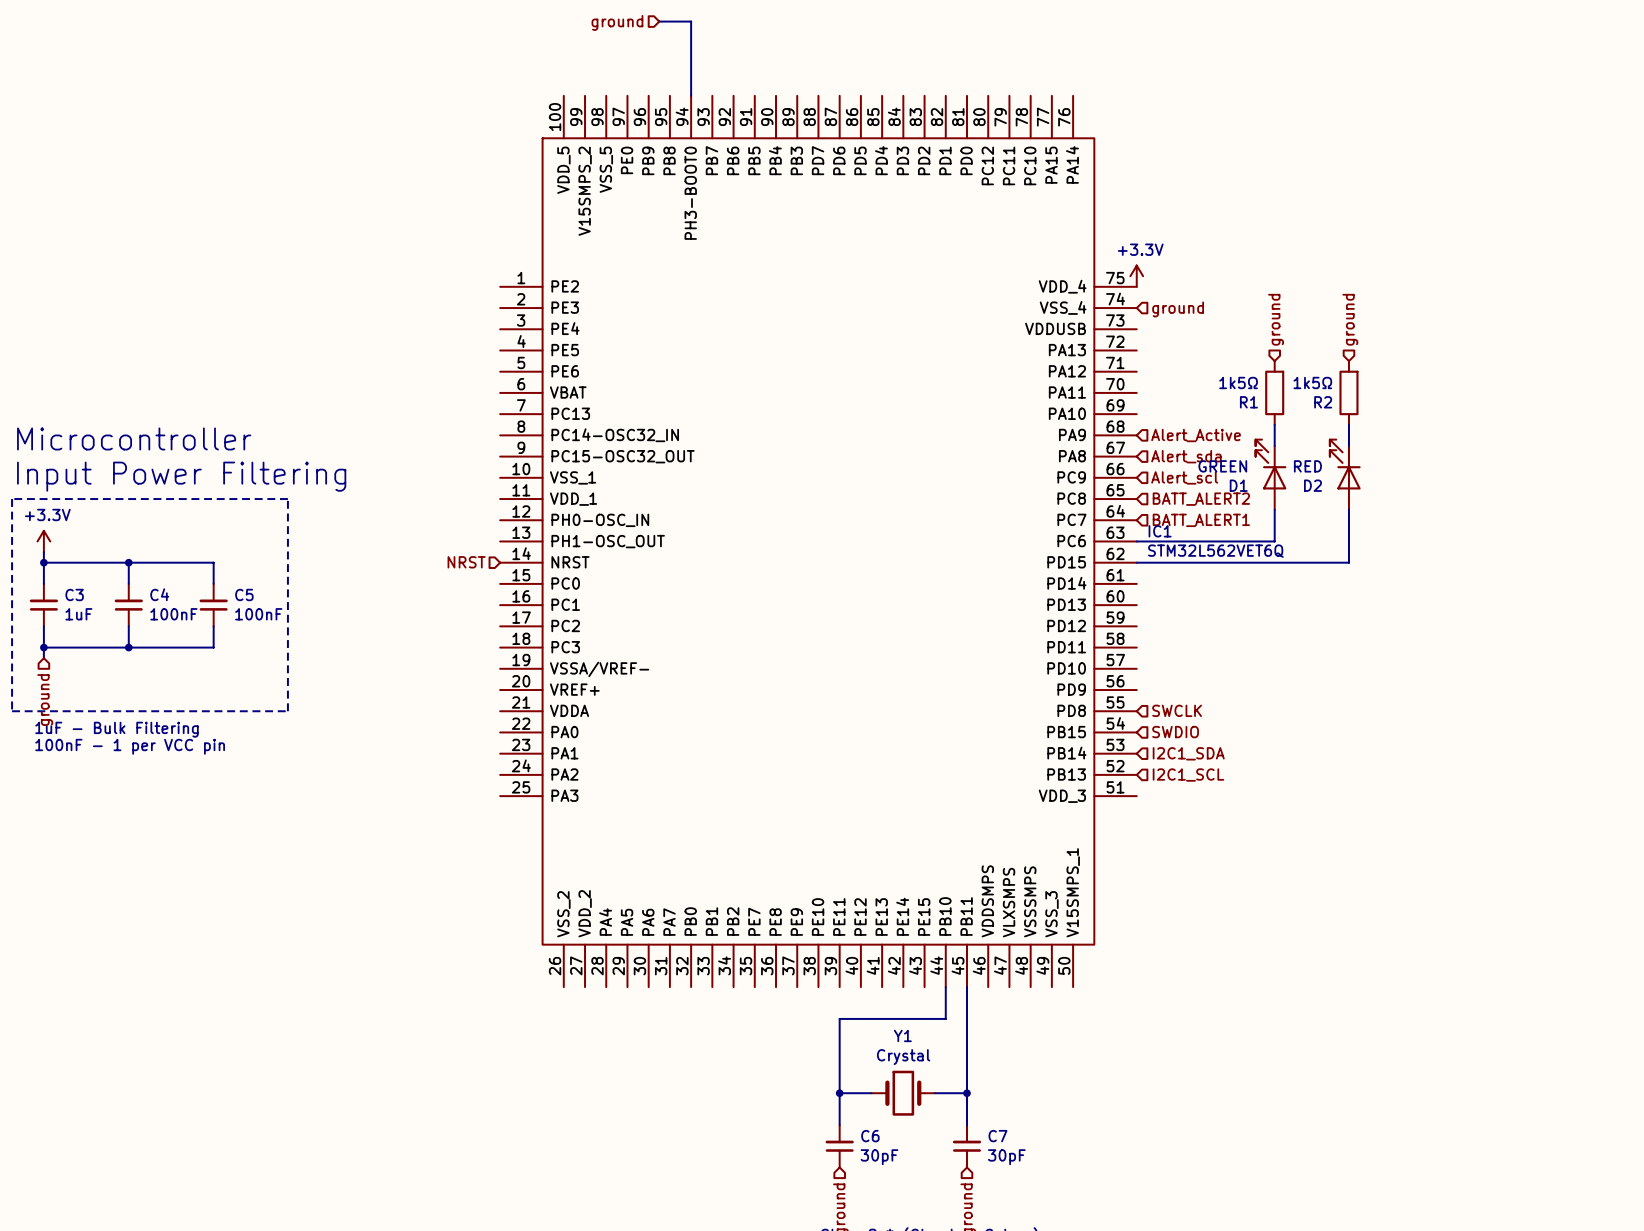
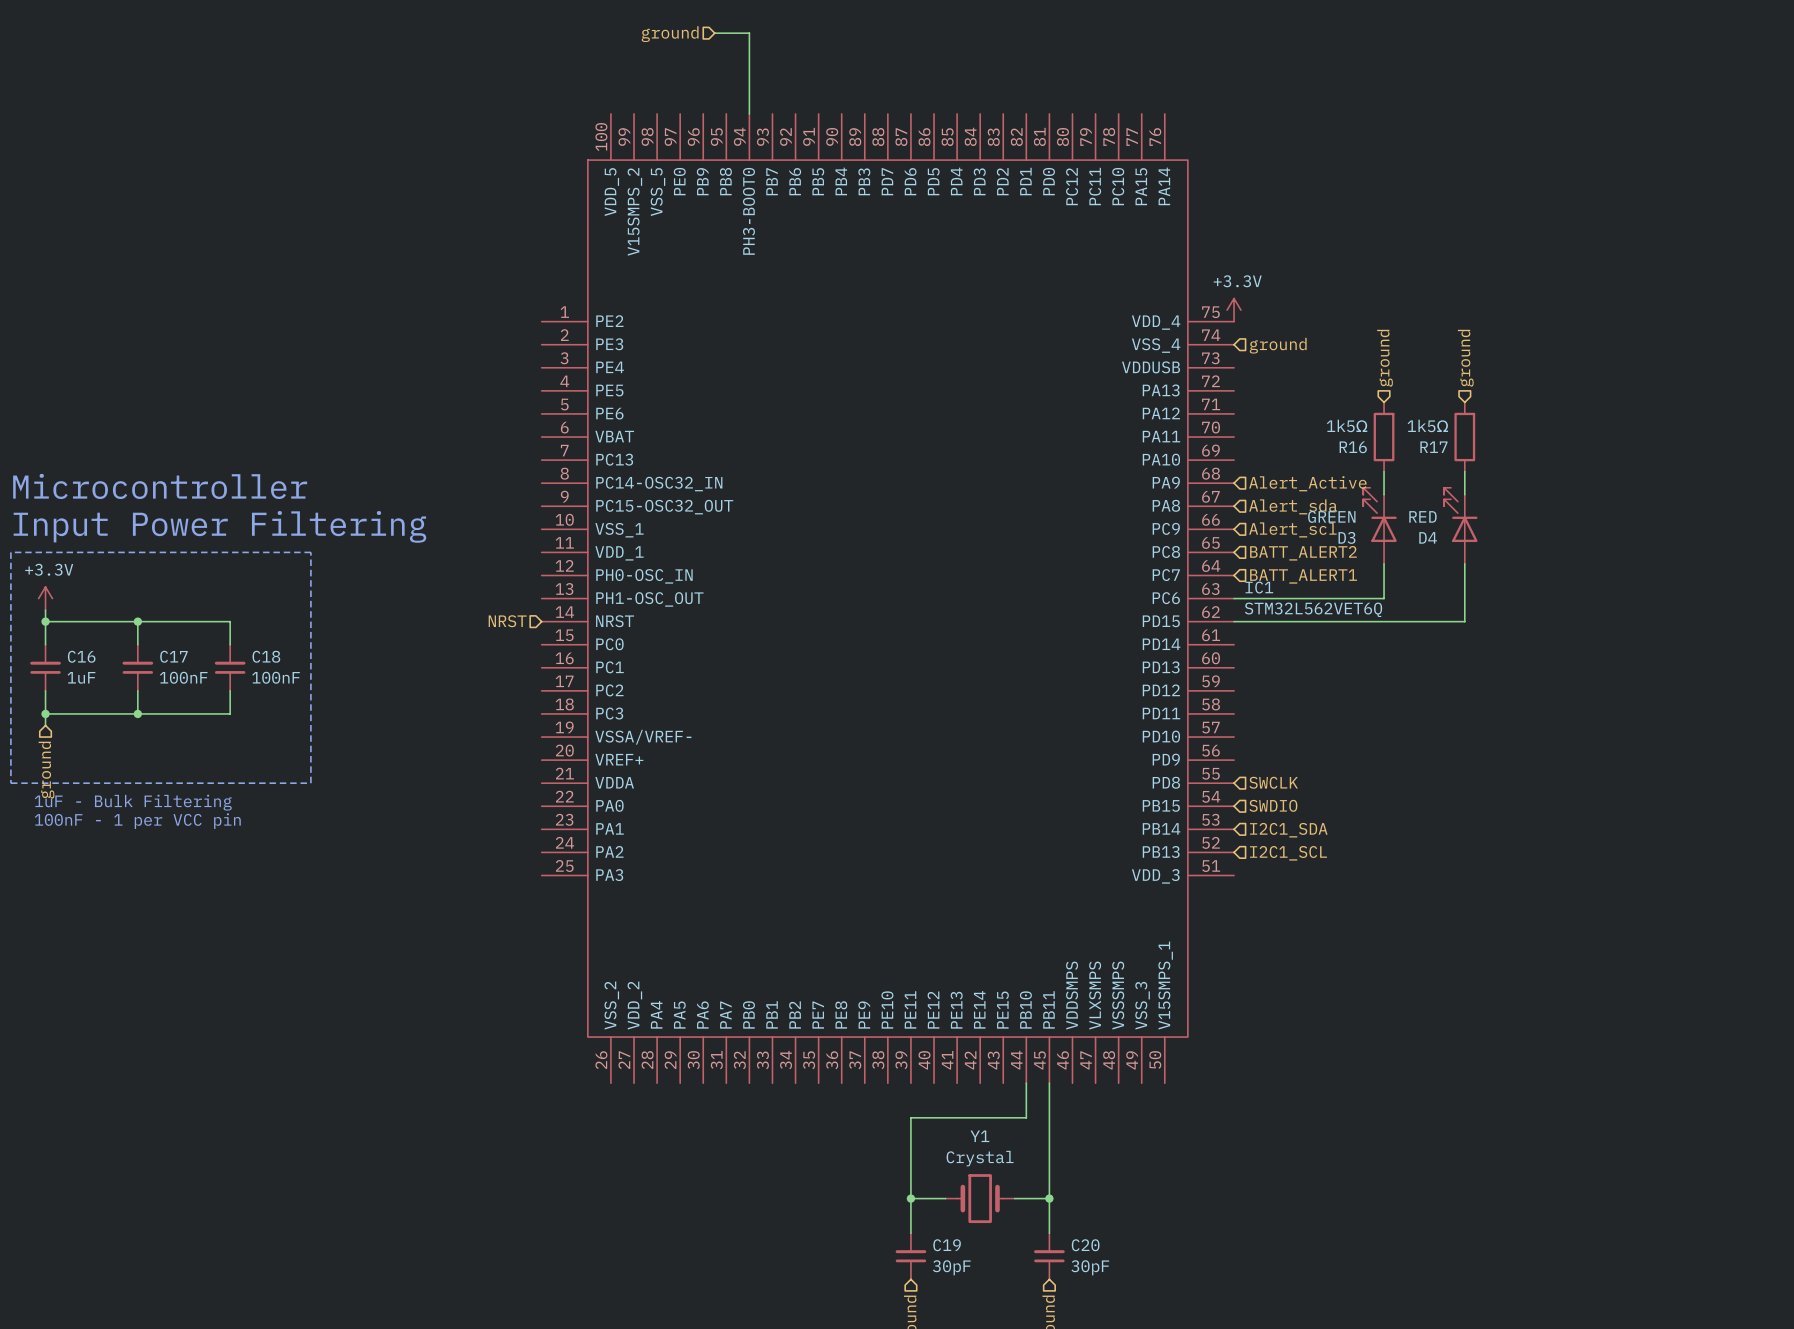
R1 name: R1 (1248, 402) -> R16 (1353, 447)
R2 name: R2 (1323, 402) -> R17 (1433, 447)
D1 name: D1 (1238, 485) -> D3 (1346, 537)
D2 name: D2 (1312, 485) -> D4 (1428, 537)
C3 name: C3 (74, 594) -> C16 (81, 656)
C4 name: C4 (159, 594) -> C17 (173, 656)
C5 name: C5 (244, 594) -> C18 (266, 656)
C6 name: C6 (870, 1136) -> C19 (947, 1245)
C7 name: C7 (997, 1136) -> C20 (1085, 1245)

